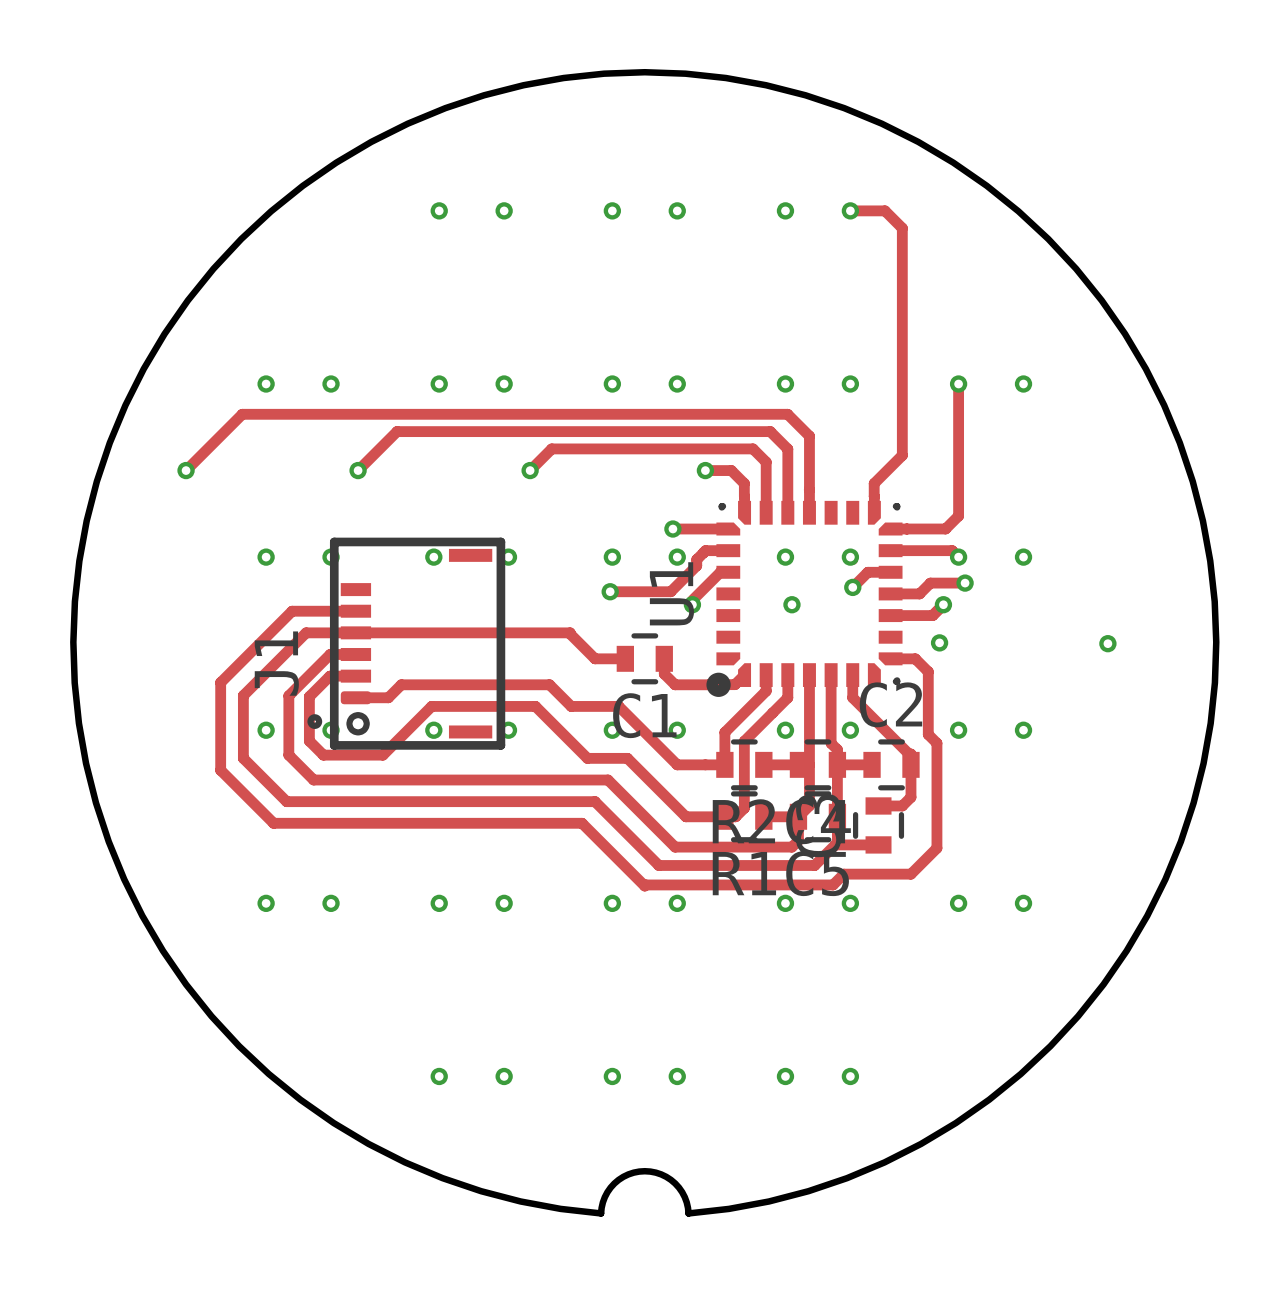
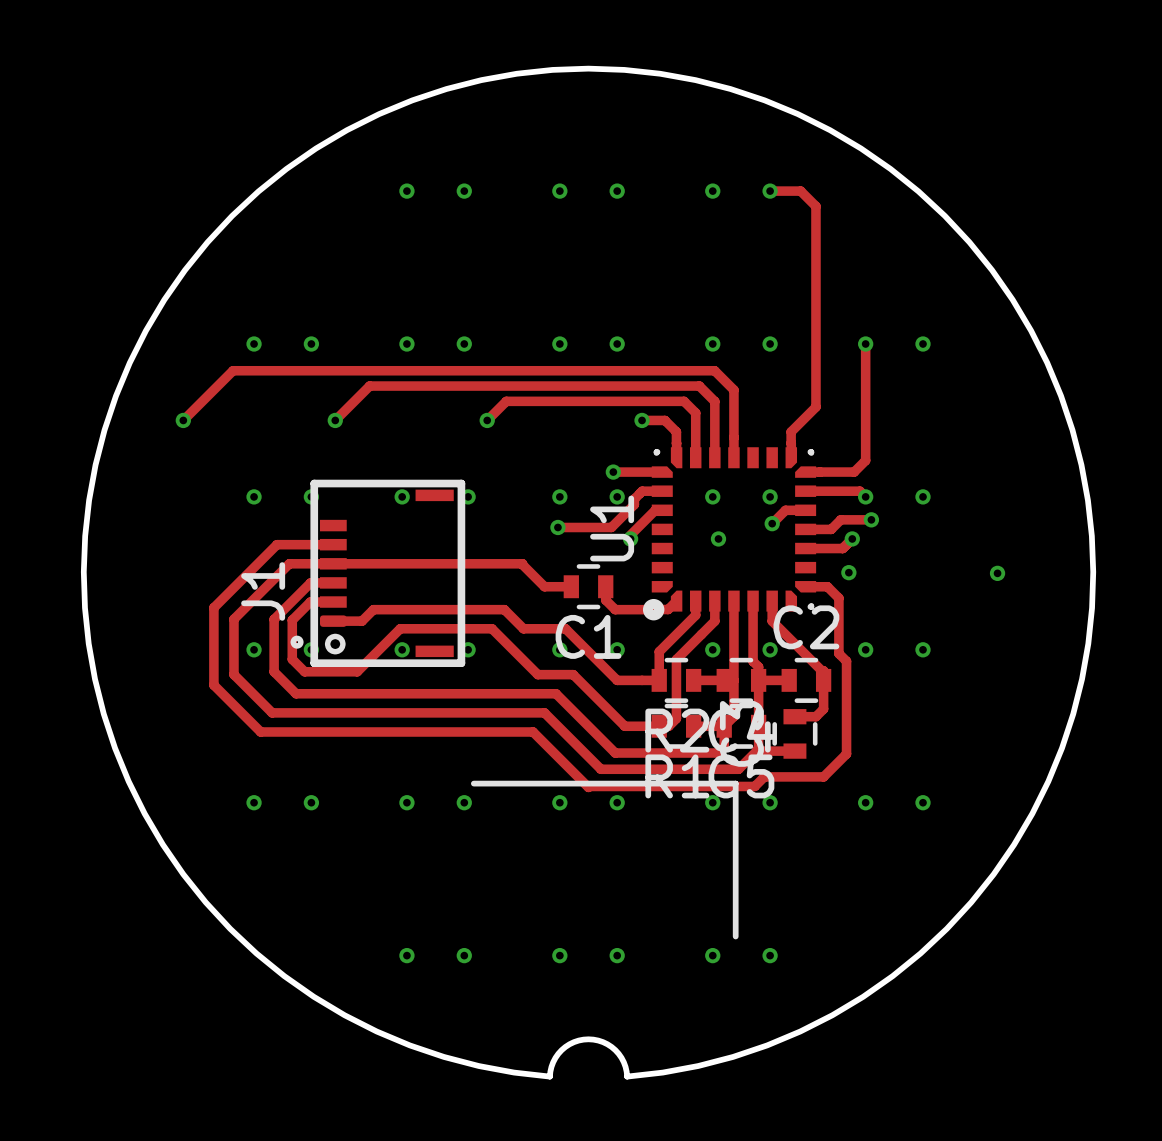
line: none -> (473, 783) (735, 783) (735, 936)

